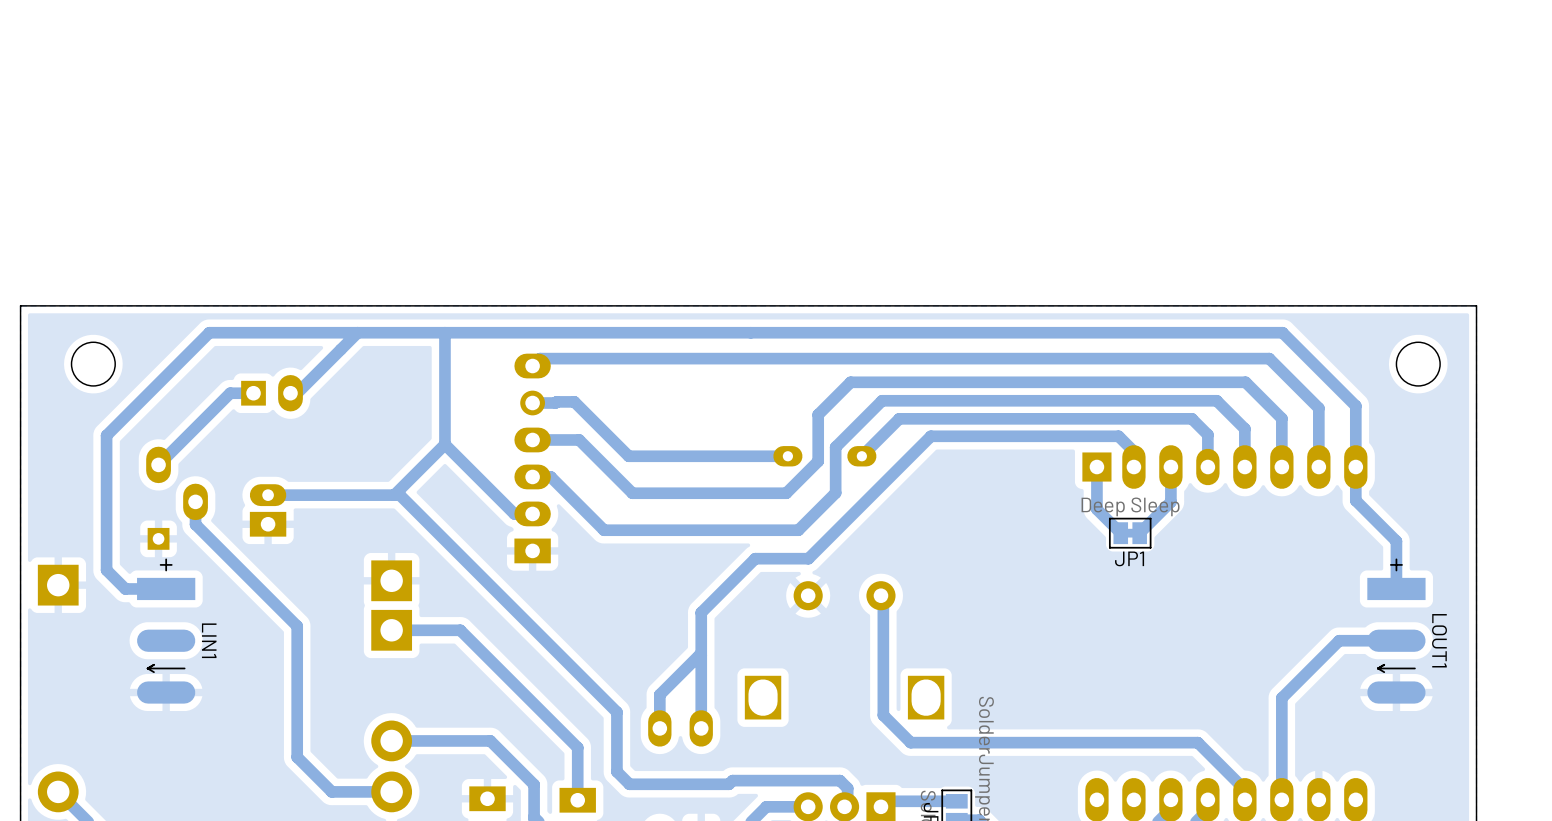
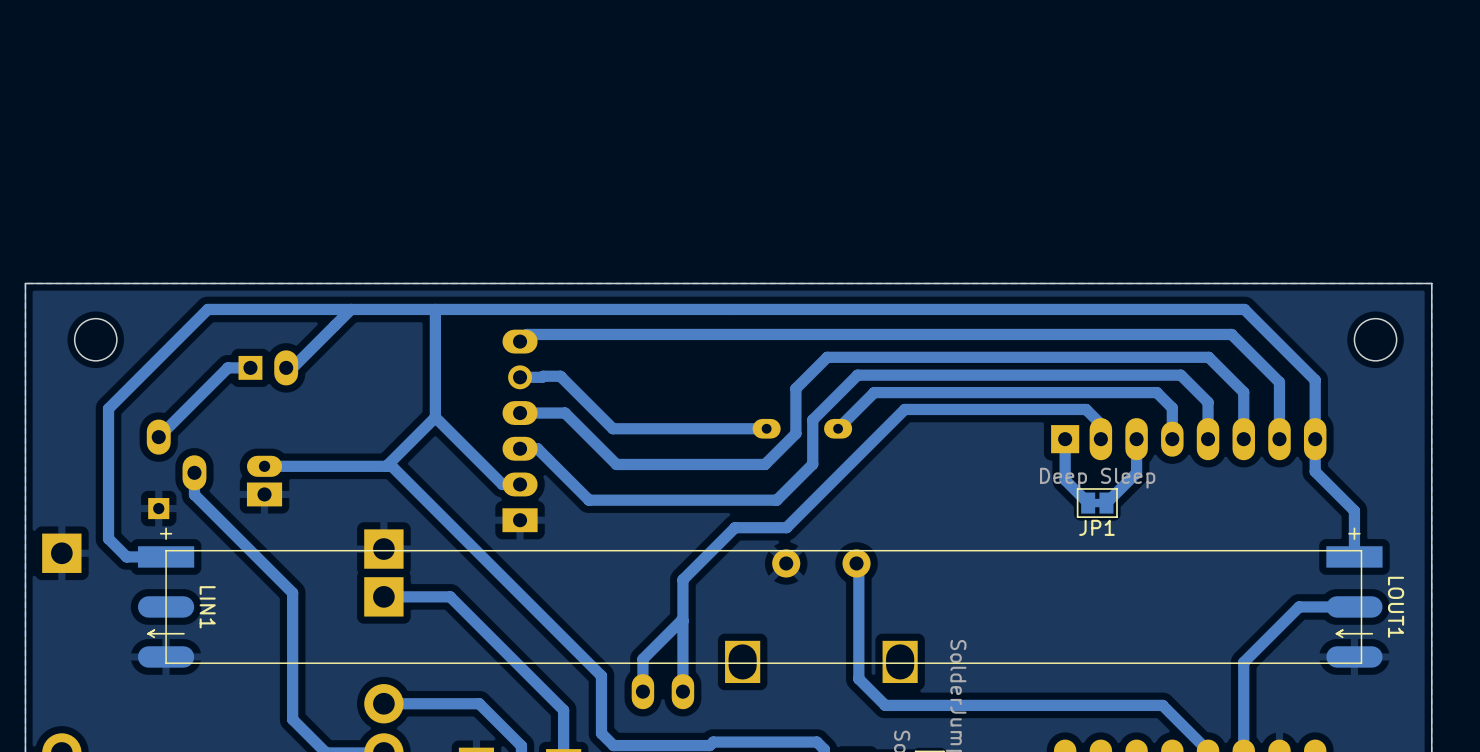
line: none -> (1361, 550) (166, 550) (166, 663) (1361, 663) (1361, 550)

